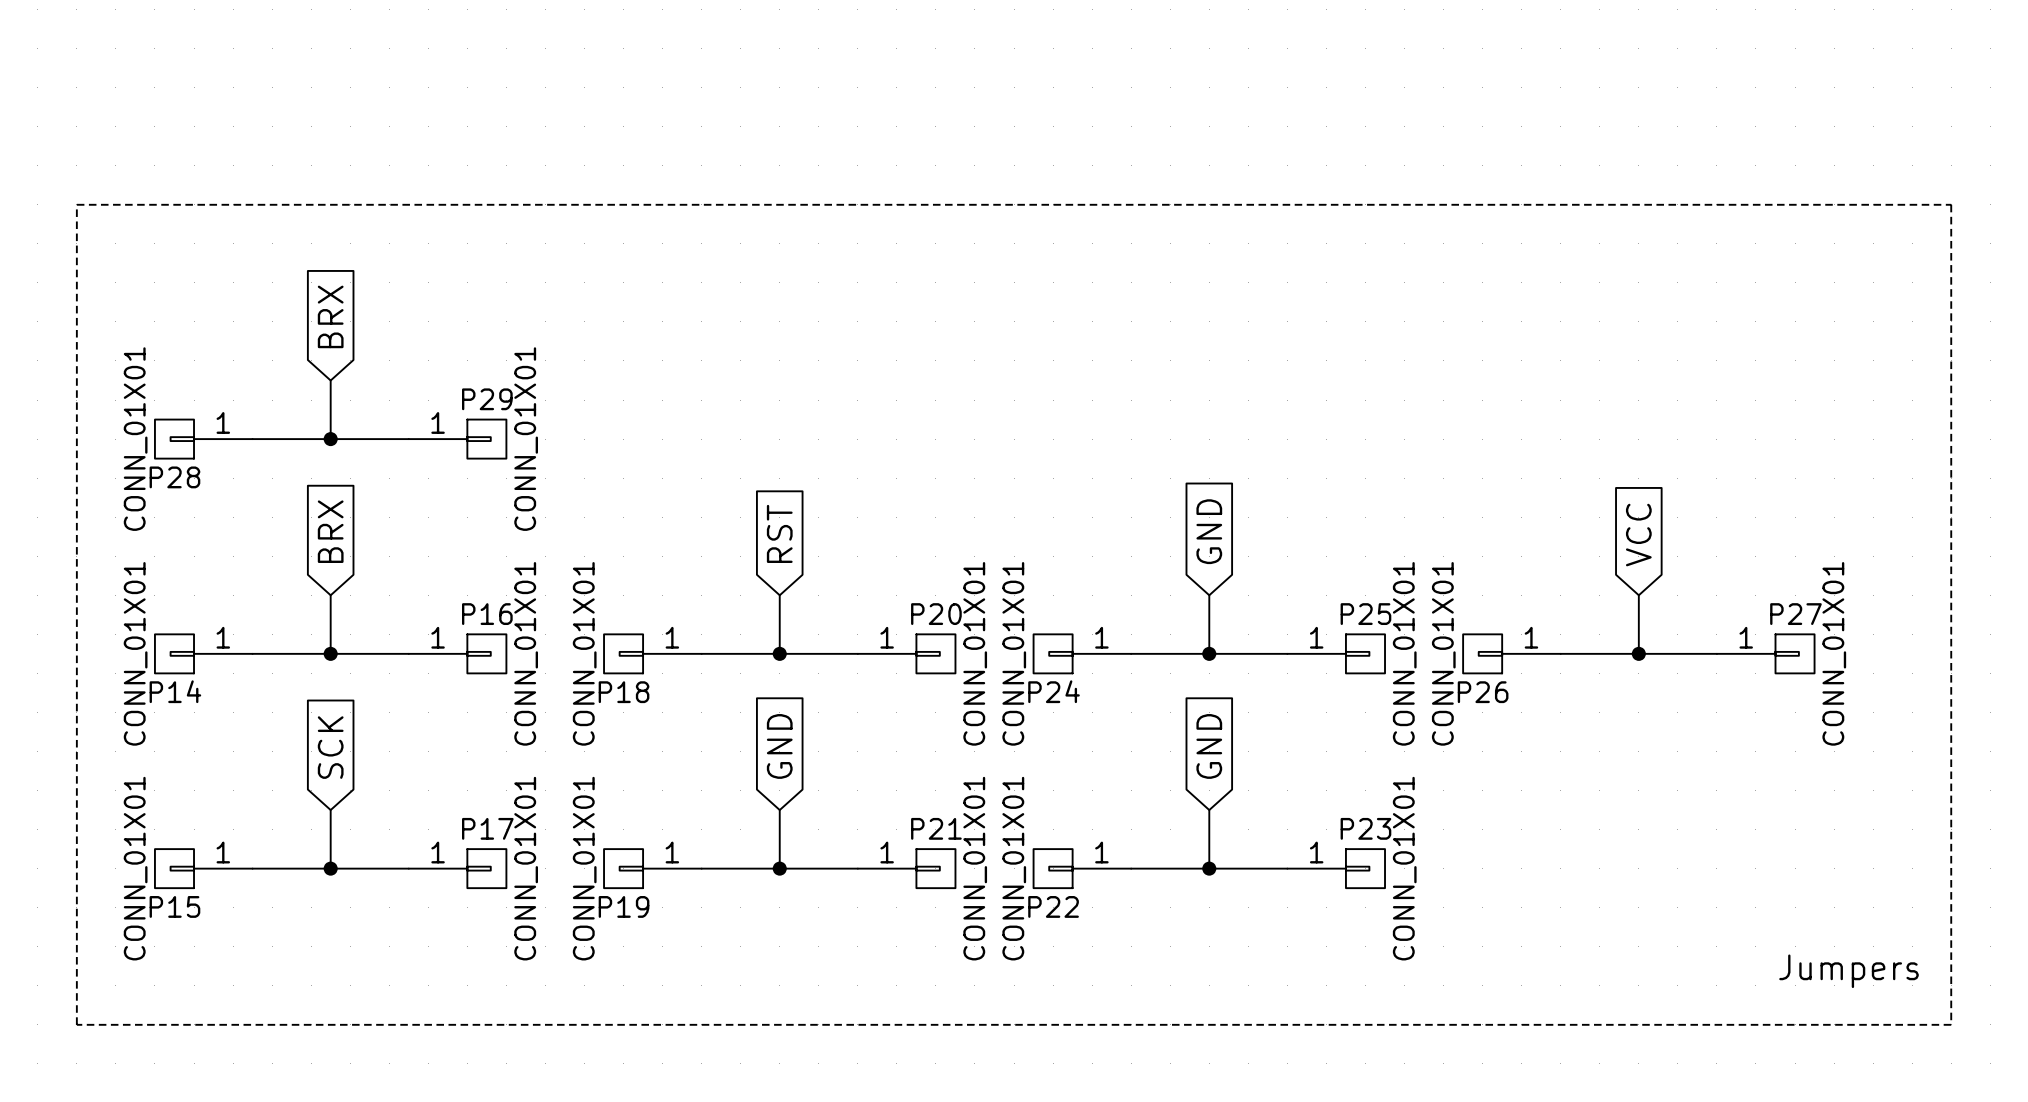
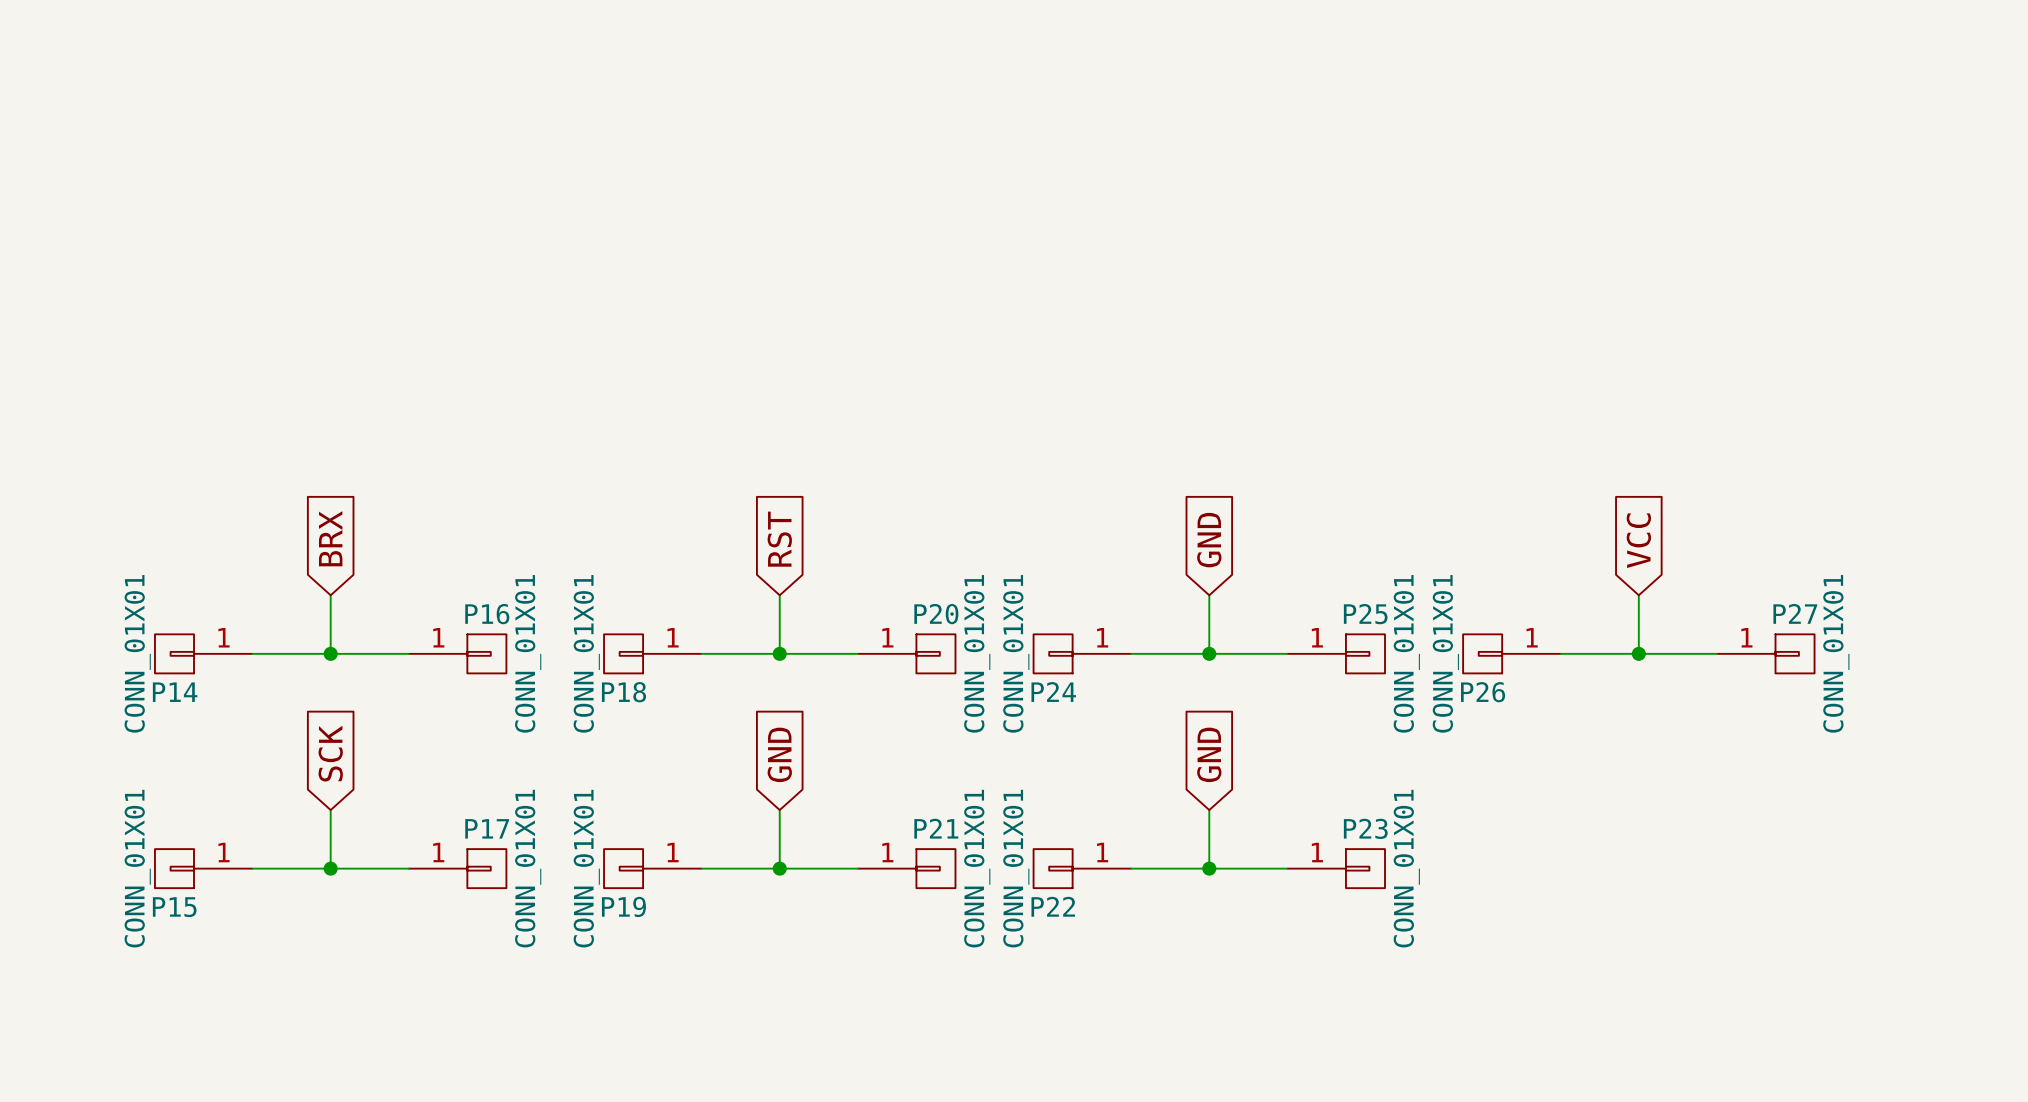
line: (76, 204) (1951, 204) (1951, 1024) (76, 1024) (76, 204) -> none
global label: BRX (330, 316) -> none
wire: (330, 380) (330, 439) -> none
P28: CONN_01X01 (203, 439) -> none
wire: (252, 439) (408, 439) -> none
junction: (330, 439) -> none
P29: CONN_01X01 (457, 439) -> none
text: Jumpers (1849, 971) -> none

